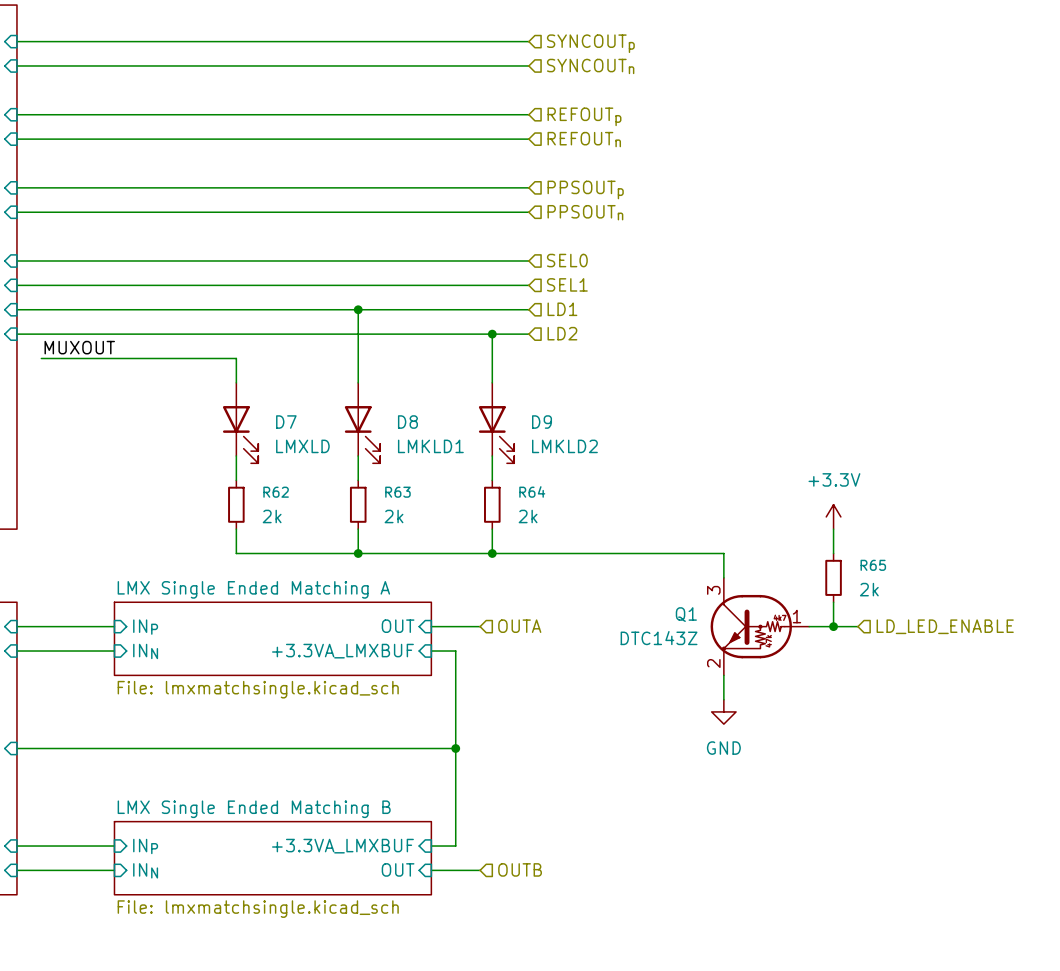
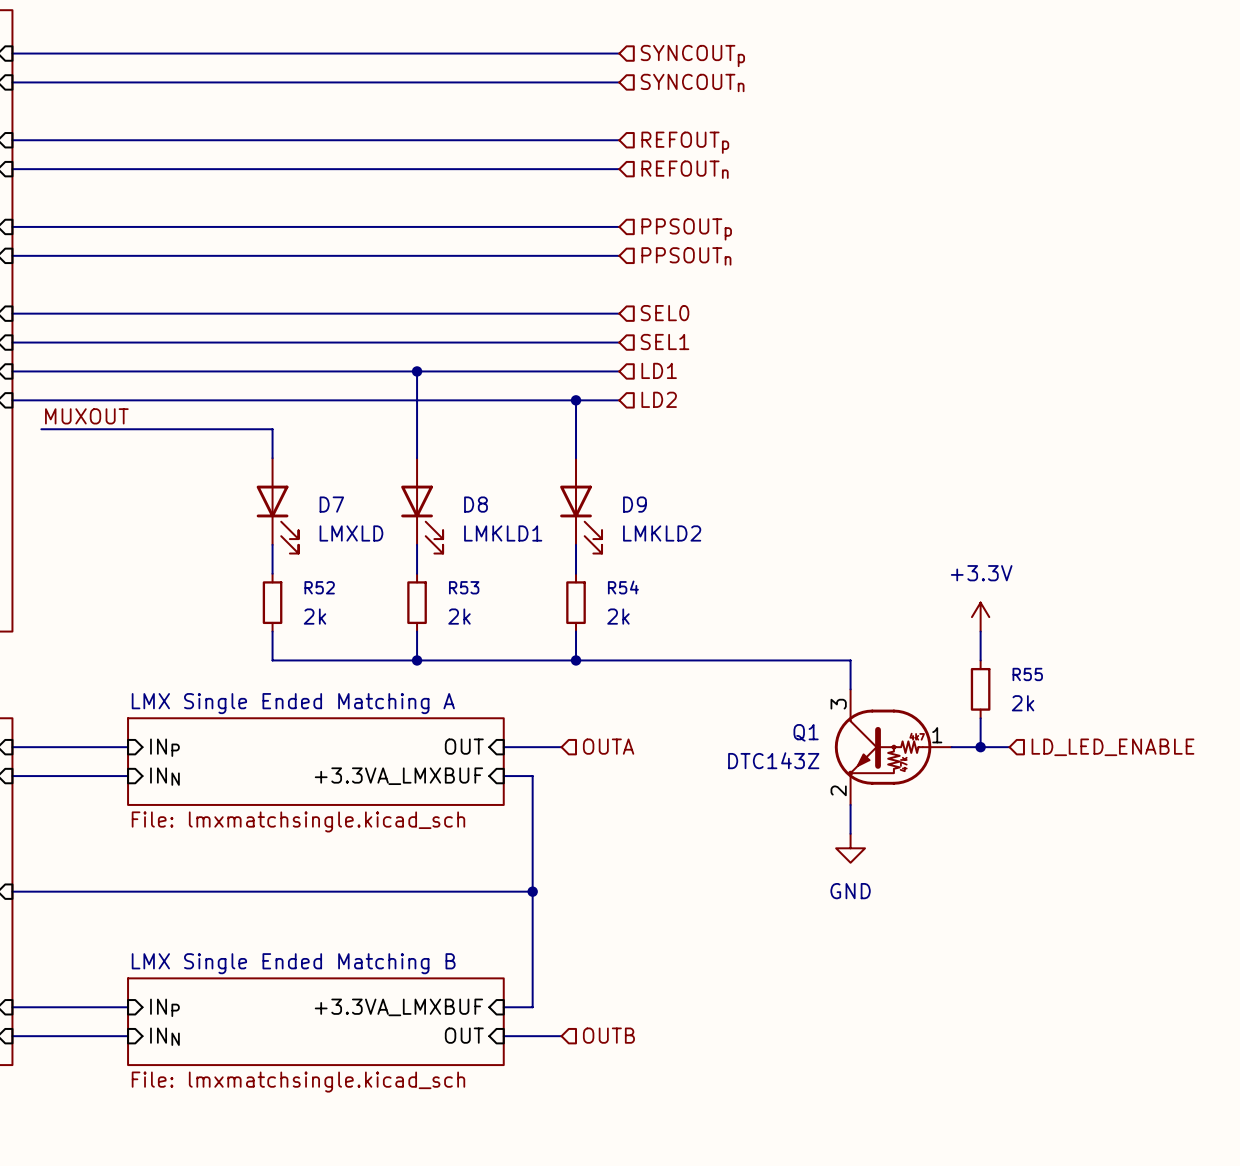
R64 name: R64 (532, 491) -> R54 (623, 587)
R62 name: R62 (276, 492) -> R52 (319, 587)
R63 name: R63 (397, 492) -> R53 (464, 587)
R65 name: R65 (873, 565) -> R55 (1027, 674)

